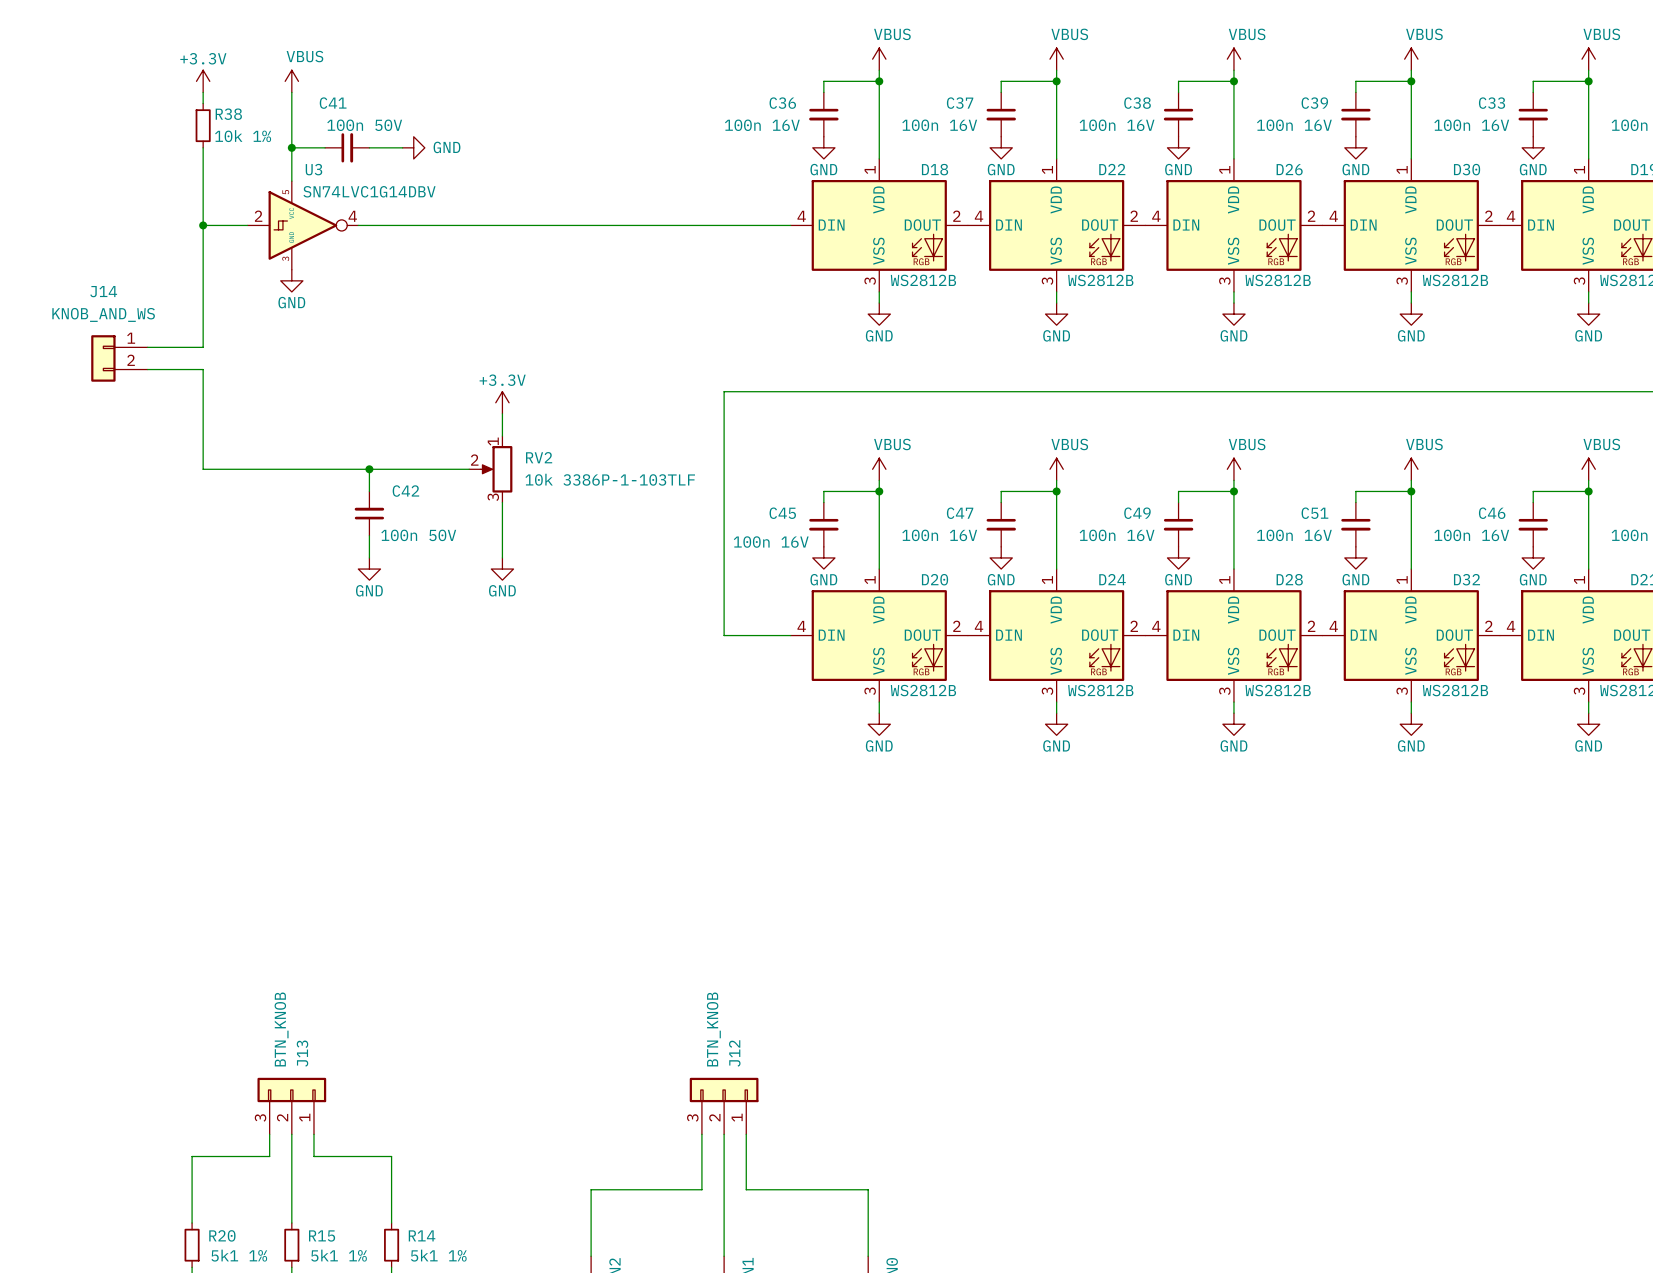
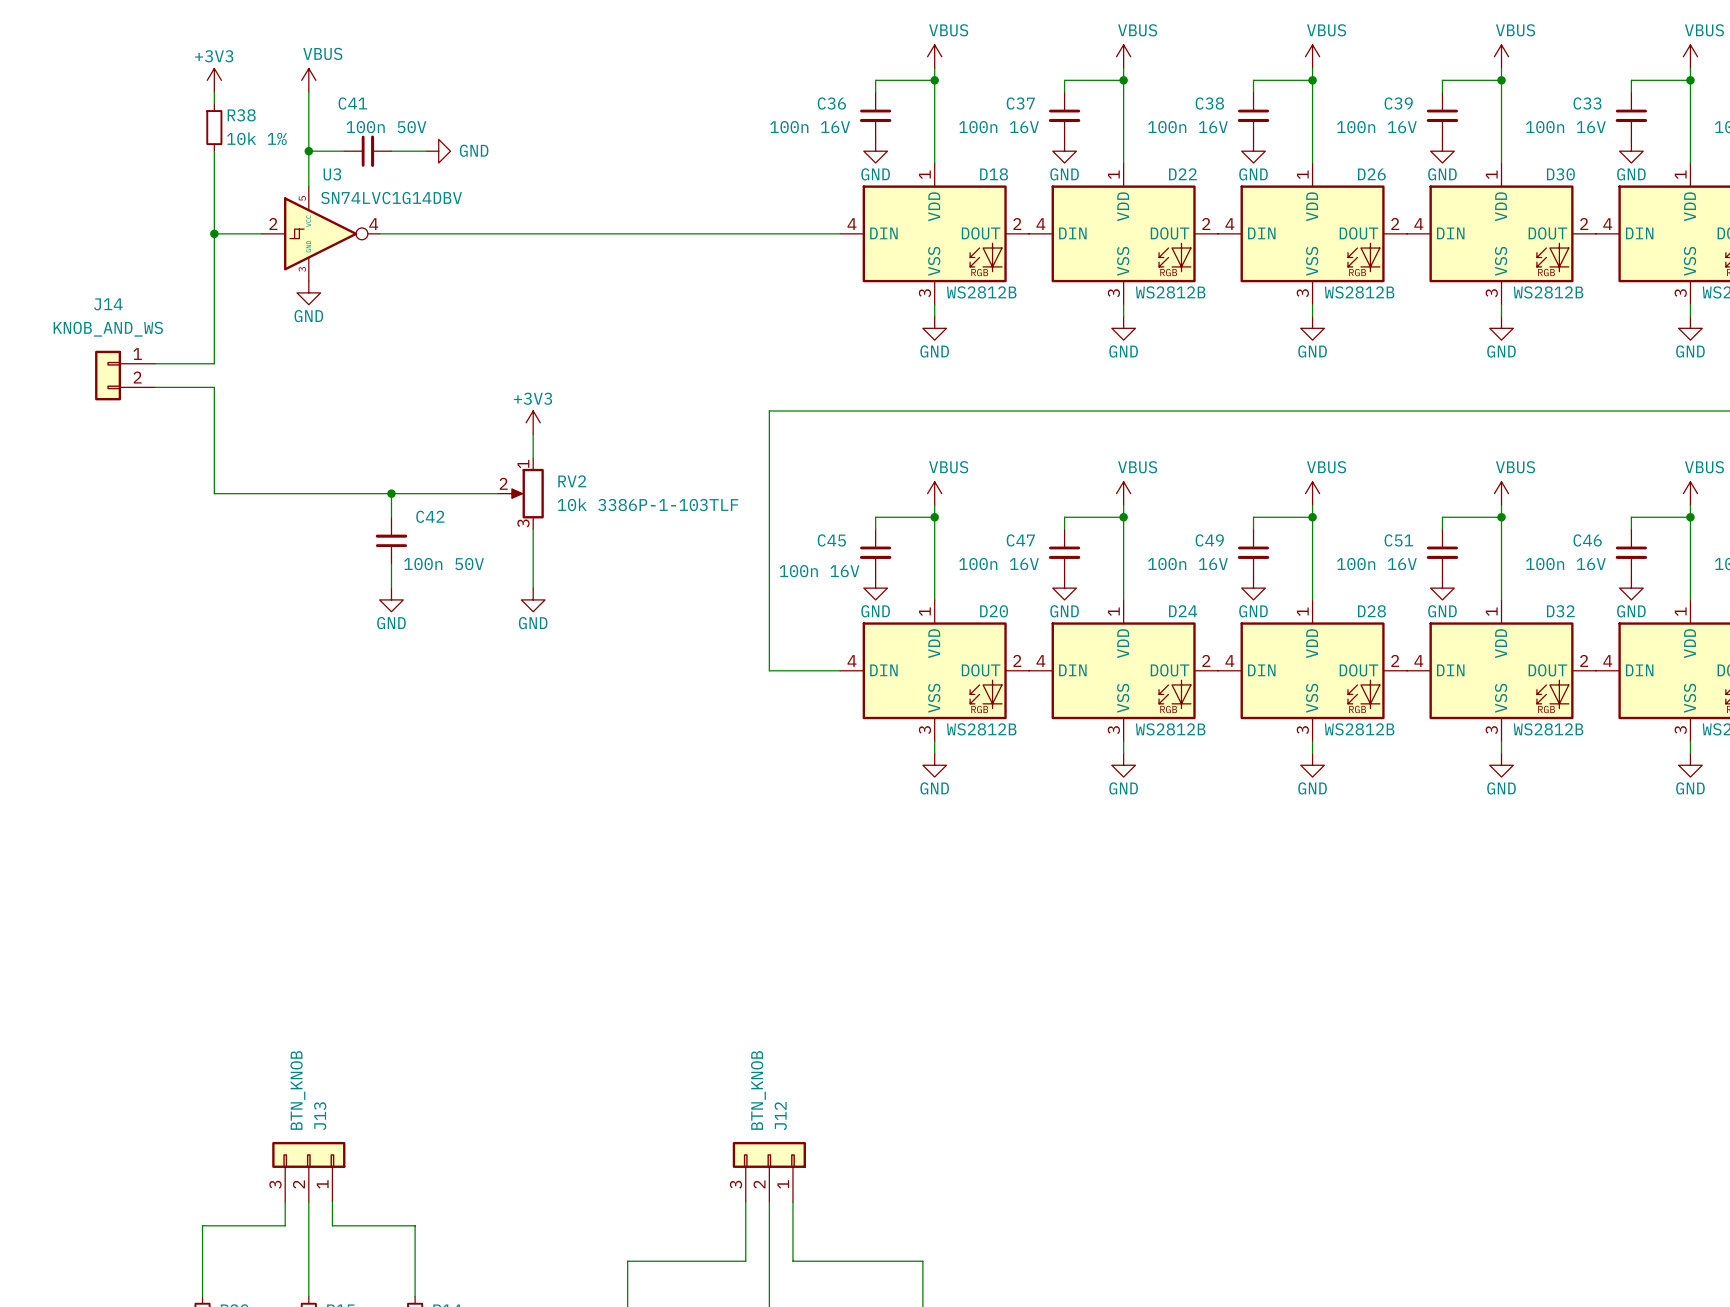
power symbol: +3.3V (203, 81) -> +3V3 (214, 80)
power symbol: +3.3V (502, 402) -> +3V3 (533, 422)

